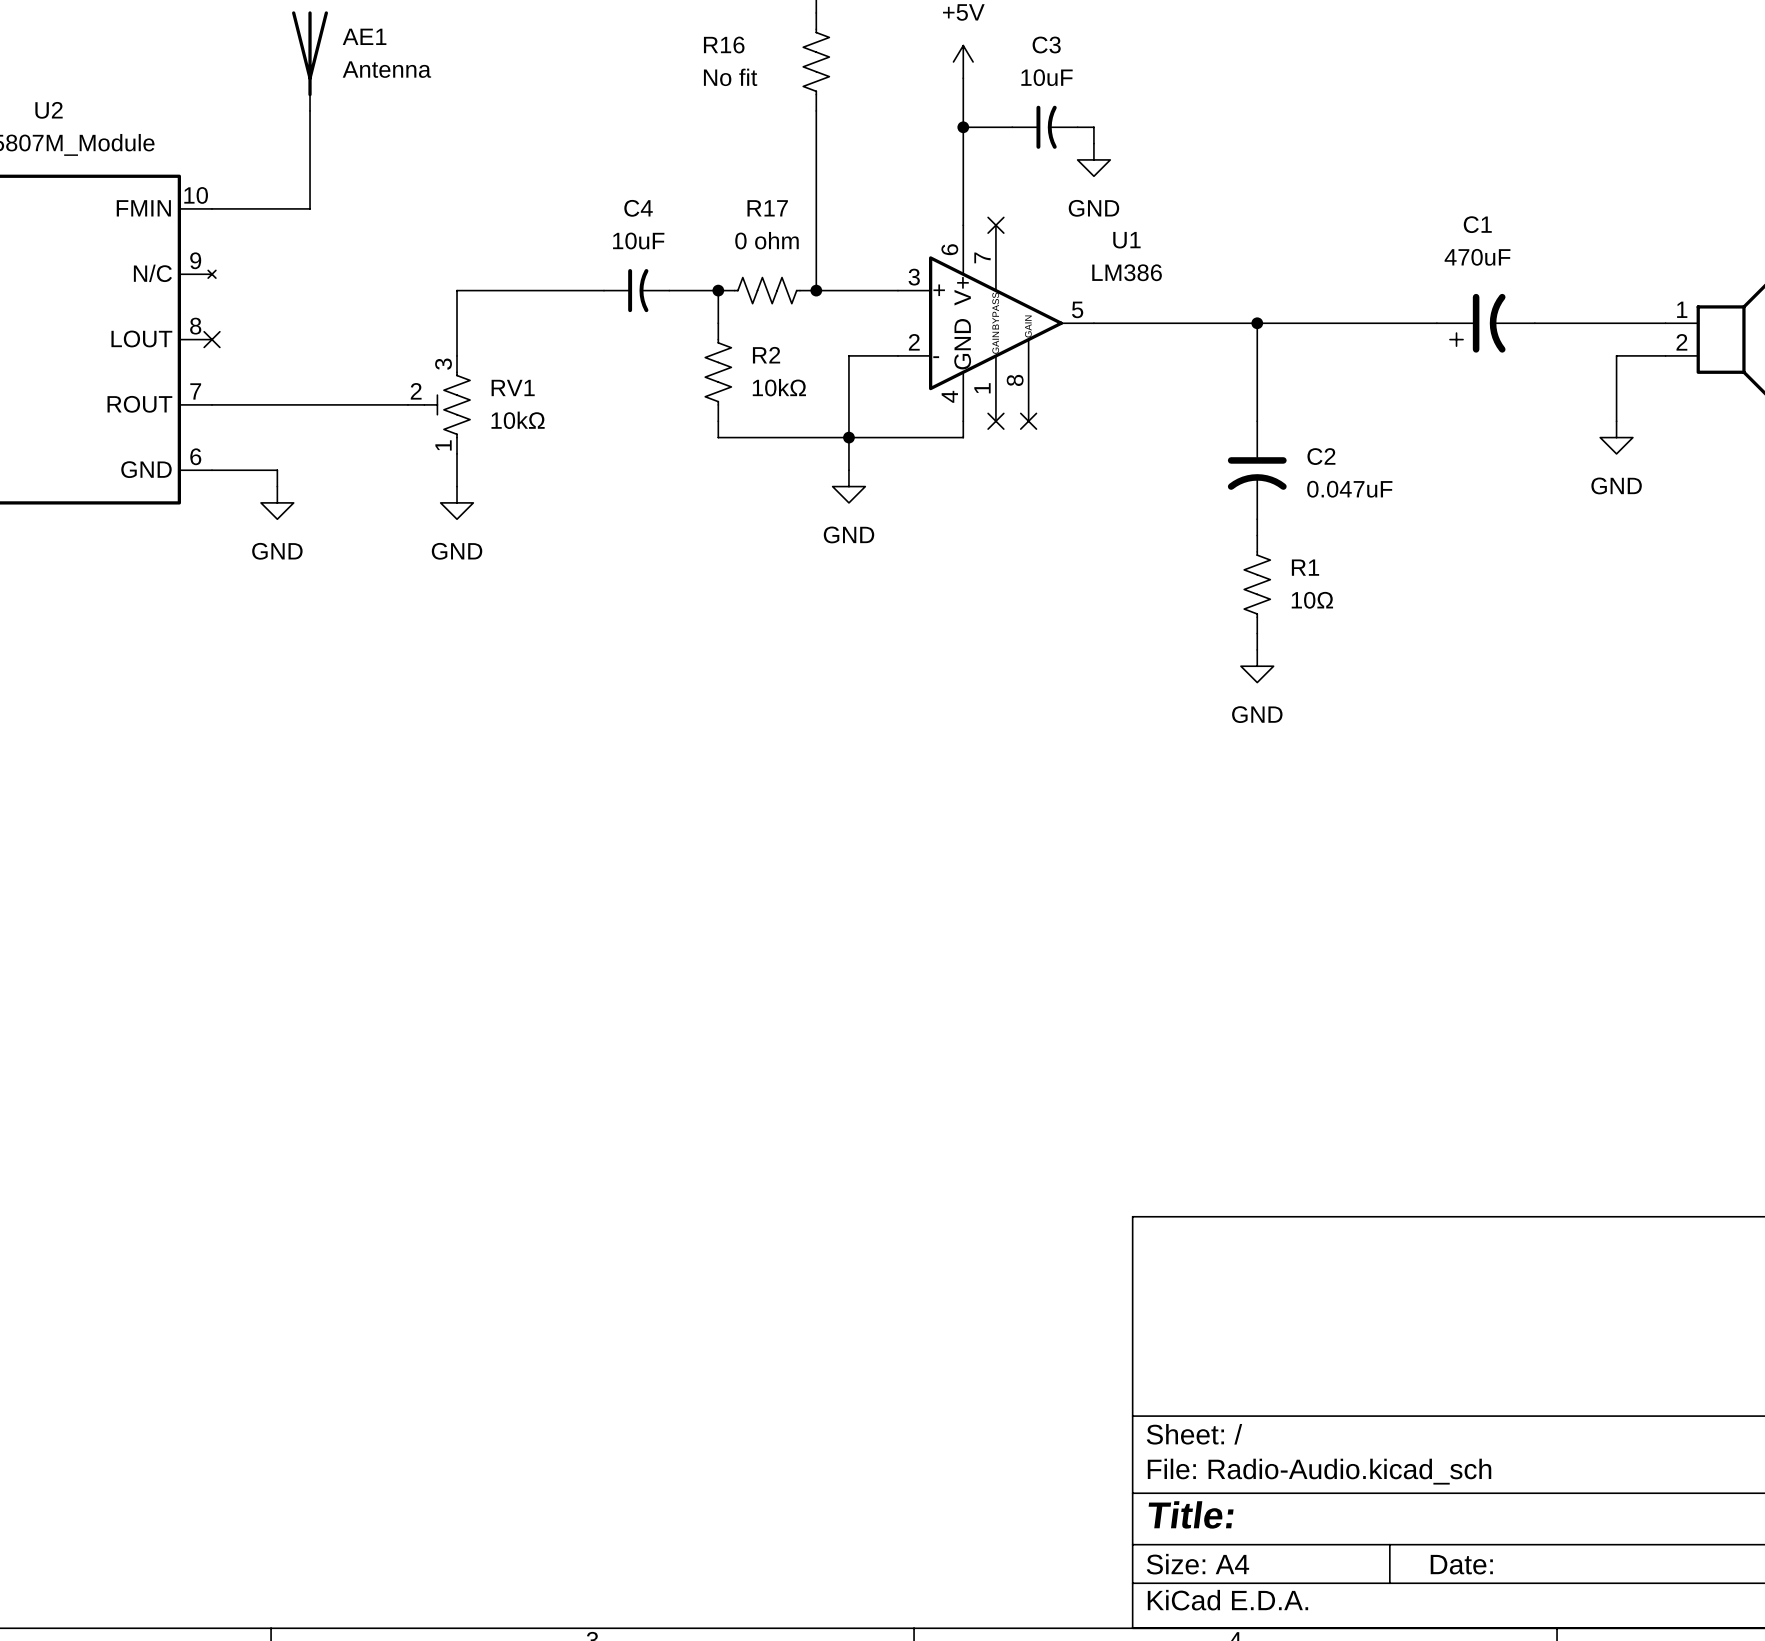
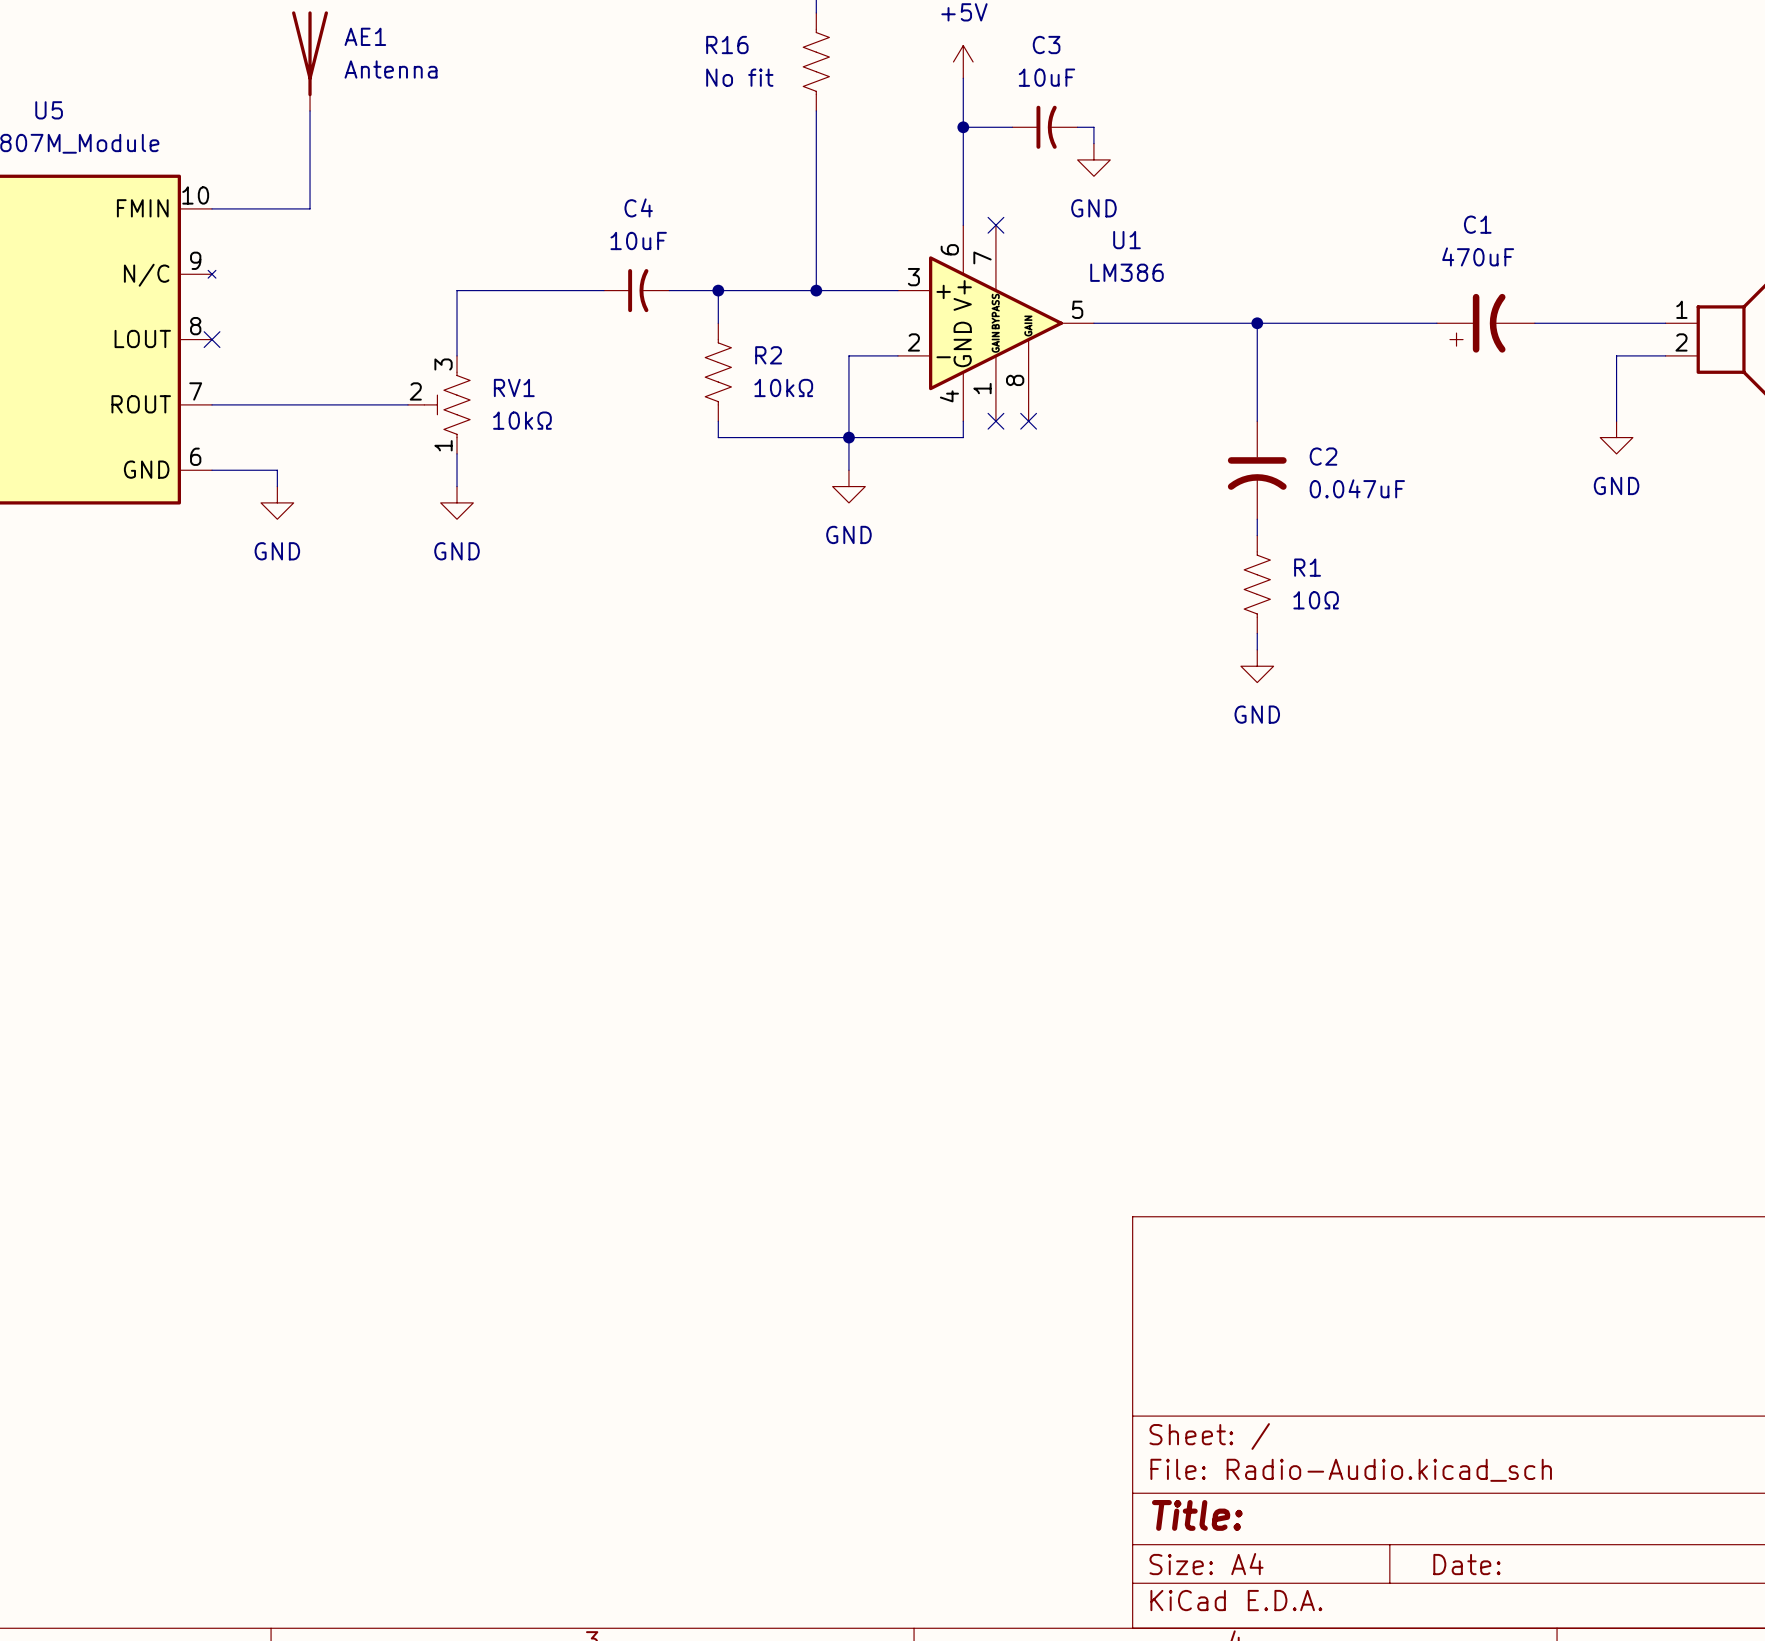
U2 name: U2 (49, 110) -> U5 (49, 110)
wire: none -> (718, 290) (816, 290)
R17: 0 ohm (767, 290) -> none

